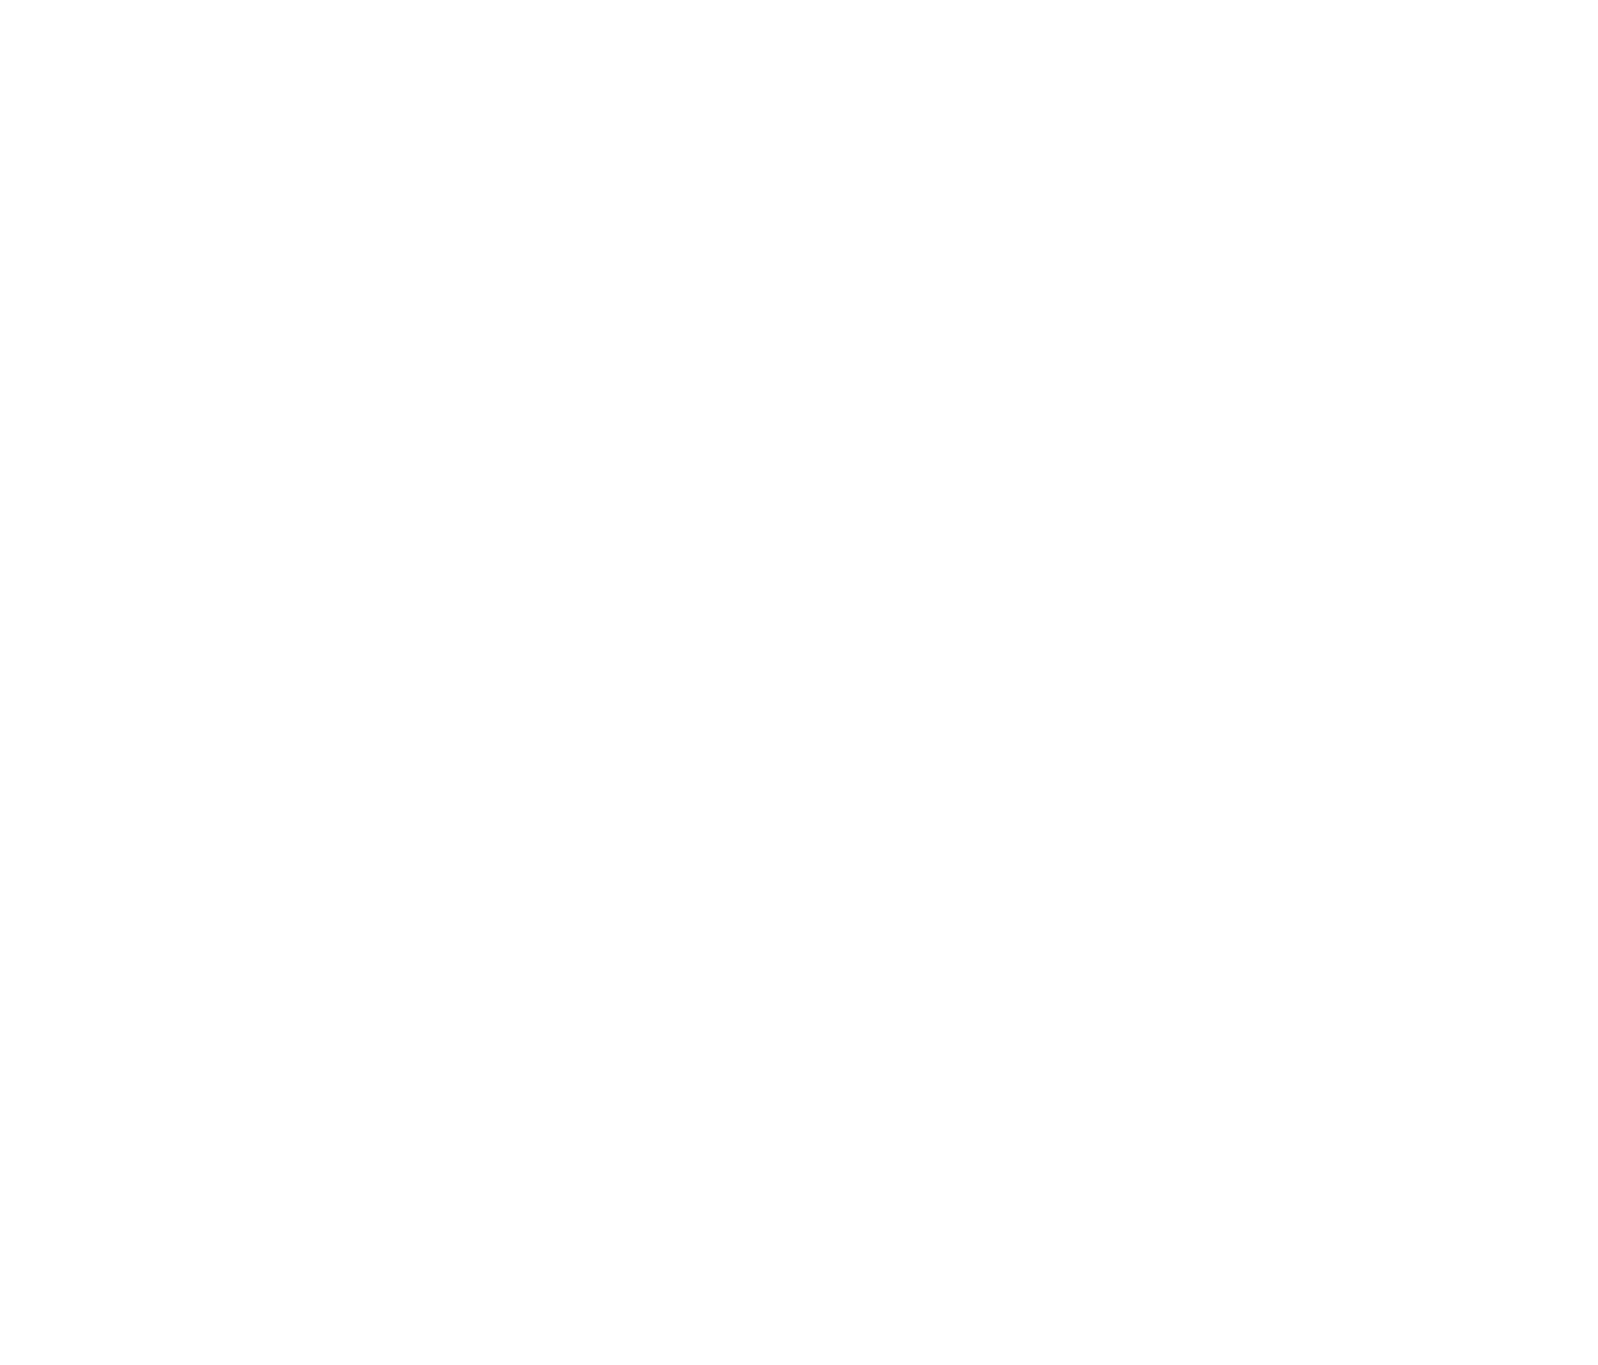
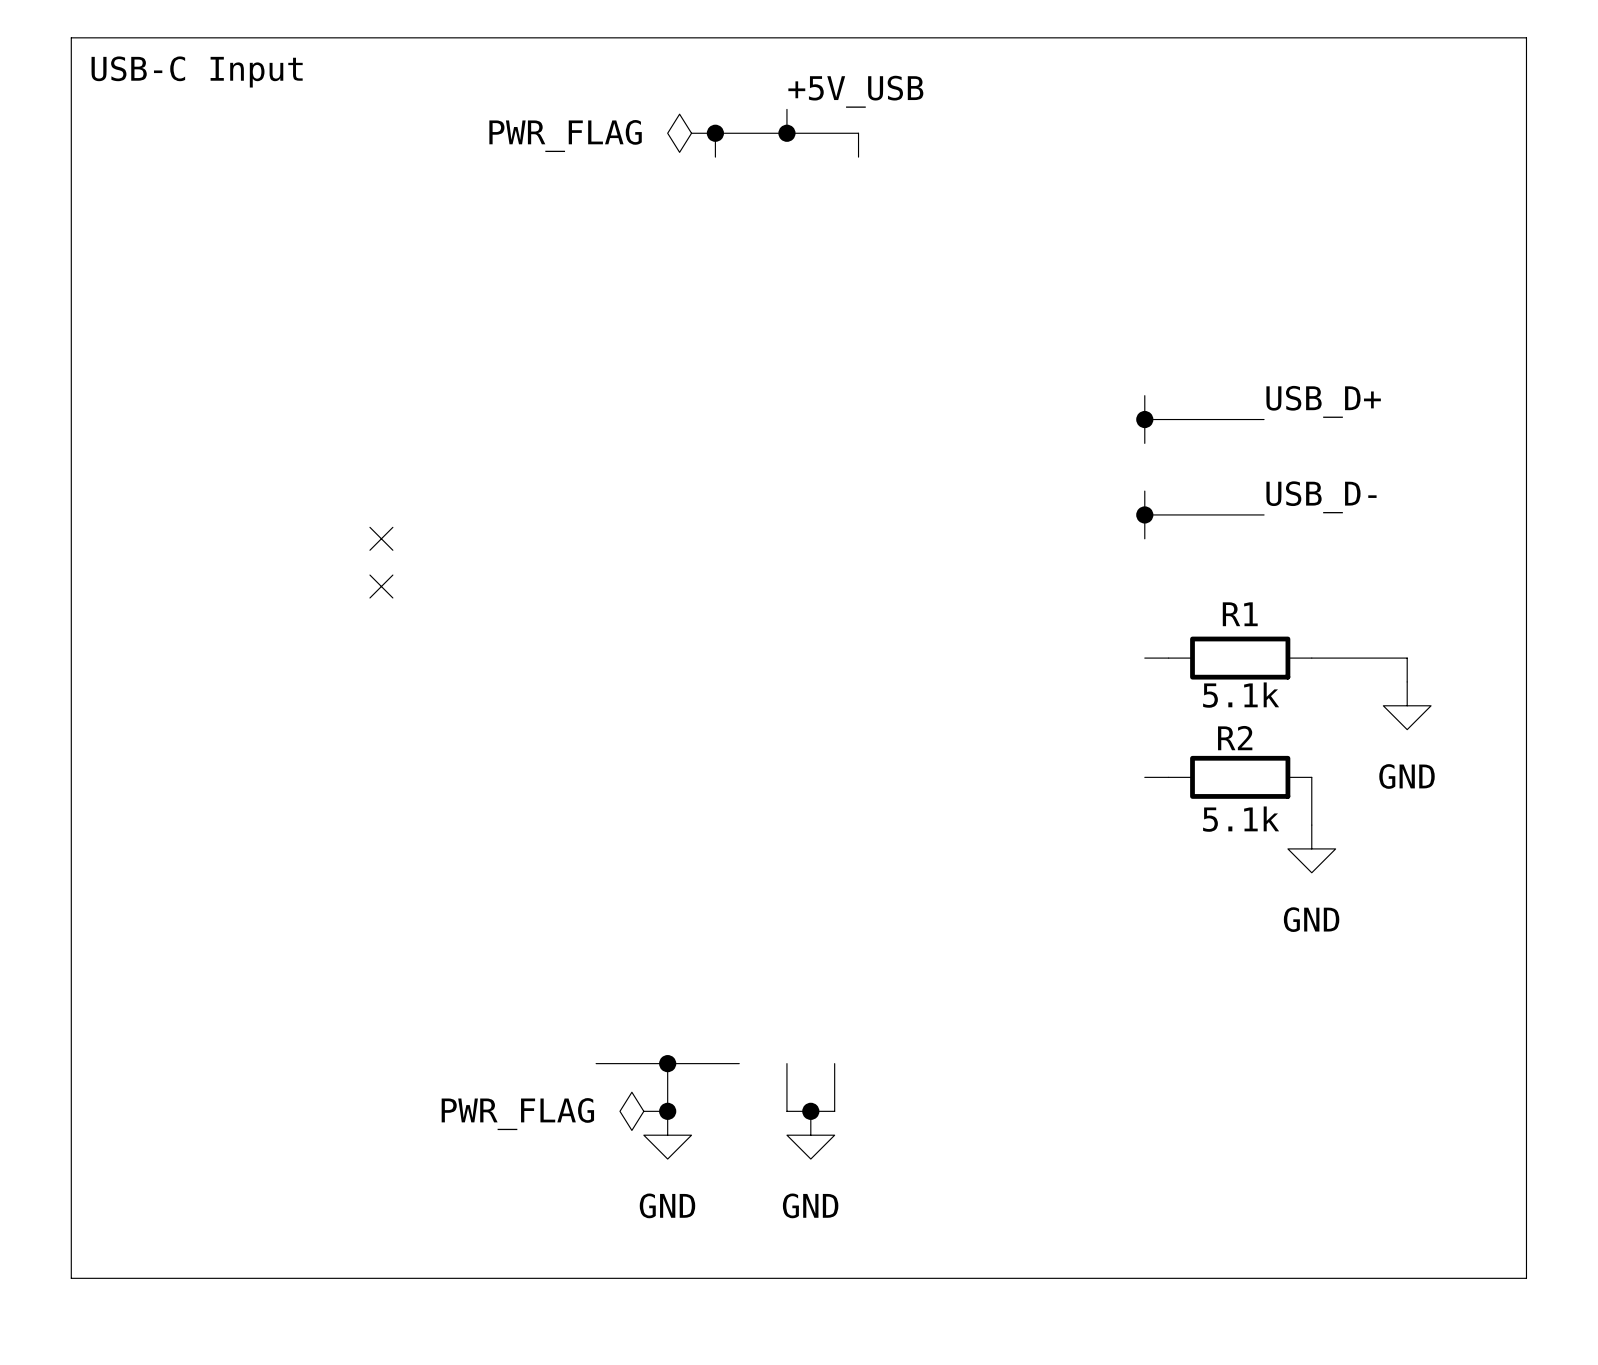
line: none -> (71, 37) (1526, 37) (1526, 1278) (71, 1278) (71, 37)
text: none -> USB-C Input (197, 71)
label: none -> +5V_USB (855, 91)
wire: none -> (786, 109) (786, 133)
power symbol: none -> PWR_FLAG (691, 133)
junction: none -> (715, 133)
junction: none -> (786, 133)
wire: none -> (715, 157) (715, 133) (858, 133) (858, 157)
wire: none -> (1144, 395) (1144, 443)
label: none -> USB_D+ (1323, 401)
wire: none -> (1144, 419) (1264, 419)
junction: none -> (1144, 419)
wire: none -> (1144, 491) (1144, 538)
label: none -> USB_D- (1321, 497)
wire: none -> (1144, 514) (1264, 514)
junction: none -> (1144, 514)
no-connect mark: none -> (381, 538)
no-connect mark: none -> (381, 586)
wire: none -> (1144, 658) (1168, 658)
R1: none -> 5.1k (1240, 658)
wire: none -> (1311, 658) (1407, 658) (1407, 681)
power symbol: none -> GND (1407, 705)
wire: none -> (1144, 777) (1168, 777)
R2: none -> 5.1k (1240, 777)
wire: none -> (1311, 777) (1311, 825)
power symbol: none -> GND (1311, 848)
wire: none -> (596, 1063) (739, 1063)
wire: none -> (667, 1063) (667, 1111)
junction: none -> (667, 1063)
wire: none -> (786, 1063) (786, 1111) (834, 1111) (834, 1063)
power symbol: none -> PWR_FLAG (643, 1111)
junction: none -> (667, 1111)
junction: none -> (810, 1111)
power symbol: none -> GND (667, 1135)
power symbol: none -> GND (810, 1135)

